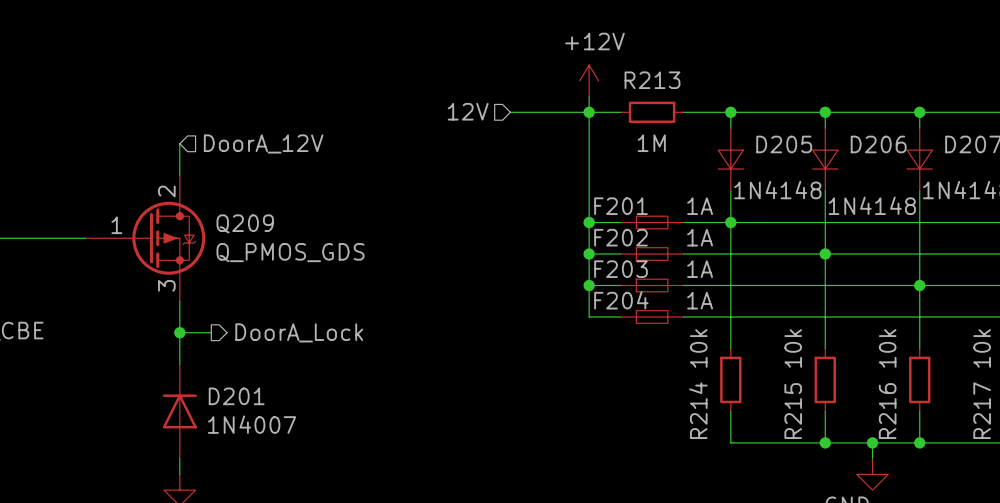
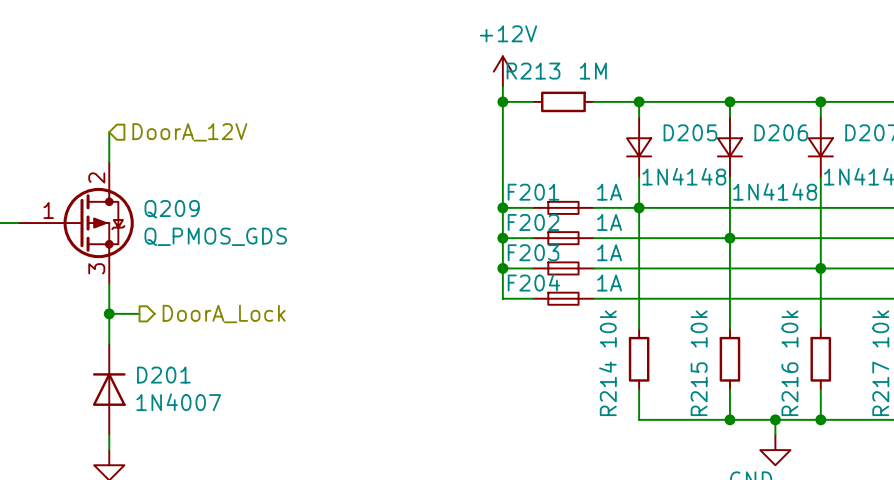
R213 name position: R213 (652, 80) -> R213 (533, 71)
hierarchical label: 12V (468, 111) -> none
wire: (510, 112) (589, 112) -> none
R213 value position: 1M (651, 143) -> 1M (593, 71)

